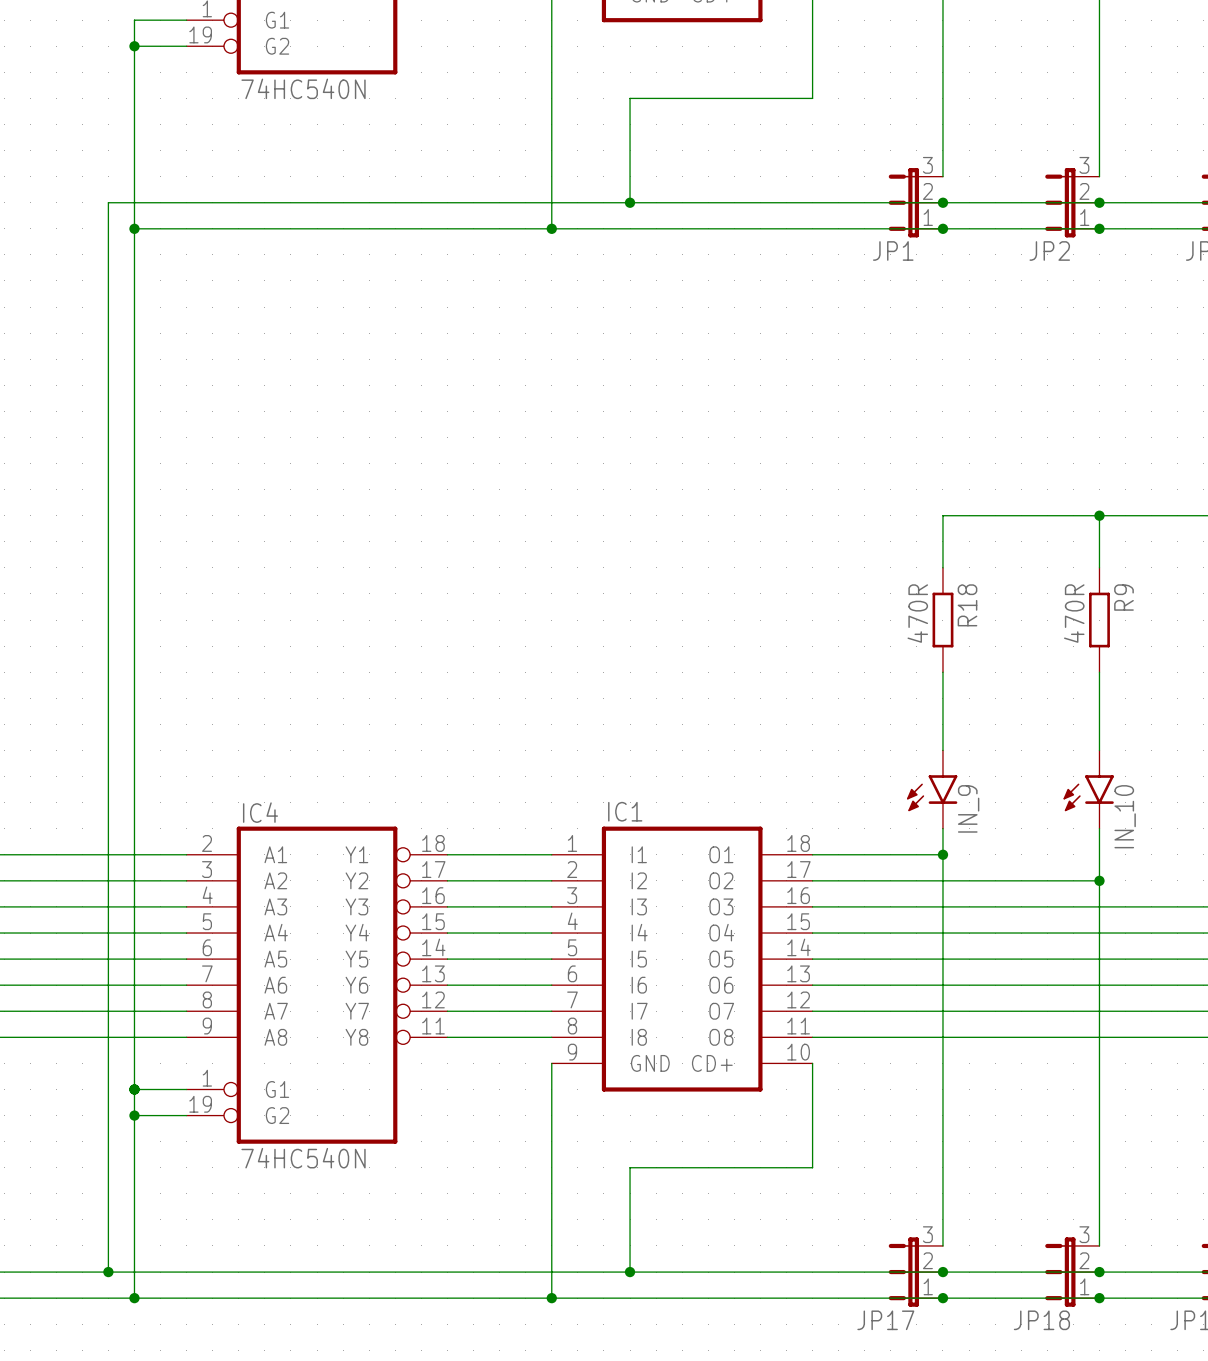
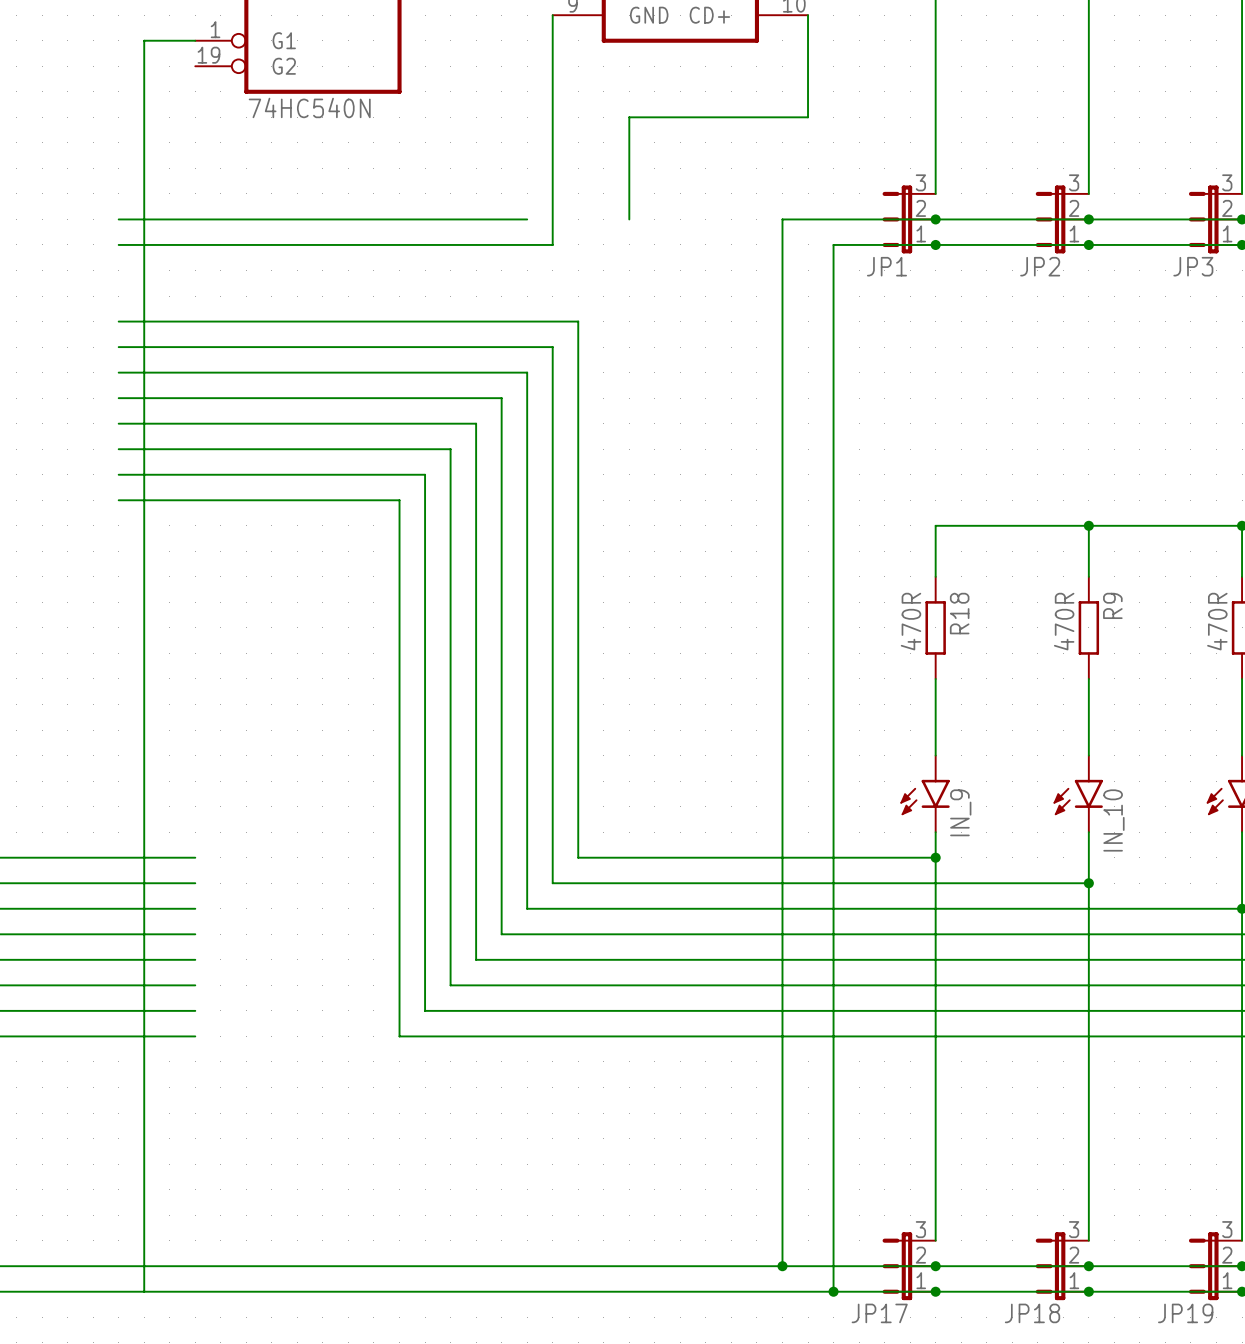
wire: (134, 46) (186, 46) -> none
junction: (134, 46) -> none
wire: (108, 202) (108, 1272) -> none
wire: (525, 202) (786, 202) -> (782, 1266) (782, 219)
junction: (630, 202) -> none
wire: none -> (118, 244) (144, 244)
junction: (134, 228) -> none
wire: (551, 228) (838, 228) -> (833, 1291) (833, 244)
junction: (551, 228) -> none
wire: none -> (118, 321) (578, 321) (578, 857) (808, 857)
wire: none -> (118, 347) (552, 347) (552, 883) (808, 883)
wire: none -> (118, 449) (450, 449) (450, 985)
wire: none -> (118, 474) (425, 474) (425, 1010) (450, 1010)
wire: none -> (118, 500) (399, 500) (399, 1036) (450, 1036)
wire: (447, 854) (551, 854) -> none
wire: (447, 880) (551, 880) -> none
wire: (447, 906) (525, 906) -> (118, 372) (527, 372) (527, 908)
wire: none -> (552, 908) (808, 908)
wire: (447, 933) (499, 933) -> (118, 398) (501, 398) (501, 934)
wire: none -> (552, 934) (808, 934)
wire: (447, 959) (473, 959) -> (118, 423) (476, 423) (476, 959)
wire: none -> (552, 959) (808, 959)
IC1: (682, 959) -> none
IC4: 74HC540N (317, 985) -> none
wire: none -> (552, 985) (808, 985)
wire: none -> (552, 1010) (808, 1010)
wire: none -> (552, 1036) (808, 1036)
wire: (551, 1063) (551, 1298) -> none
wire: (812, 1063) (812, 1167) (630, 1167) (630, 1272) -> none
wire: (134, 1089) (186, 1089) -> none
junction: (134, 1089) -> none
wire: (134, 1115) (186, 1115) -> none
junction: (134, 1115) -> none
junction: (108, 1272) -> none
junction: (630, 1272) -> none
junction: none -> (782, 1266)
junction: (134, 1298) -> none
junction: (551, 1298) -> none
junction: none -> (833, 1291)

